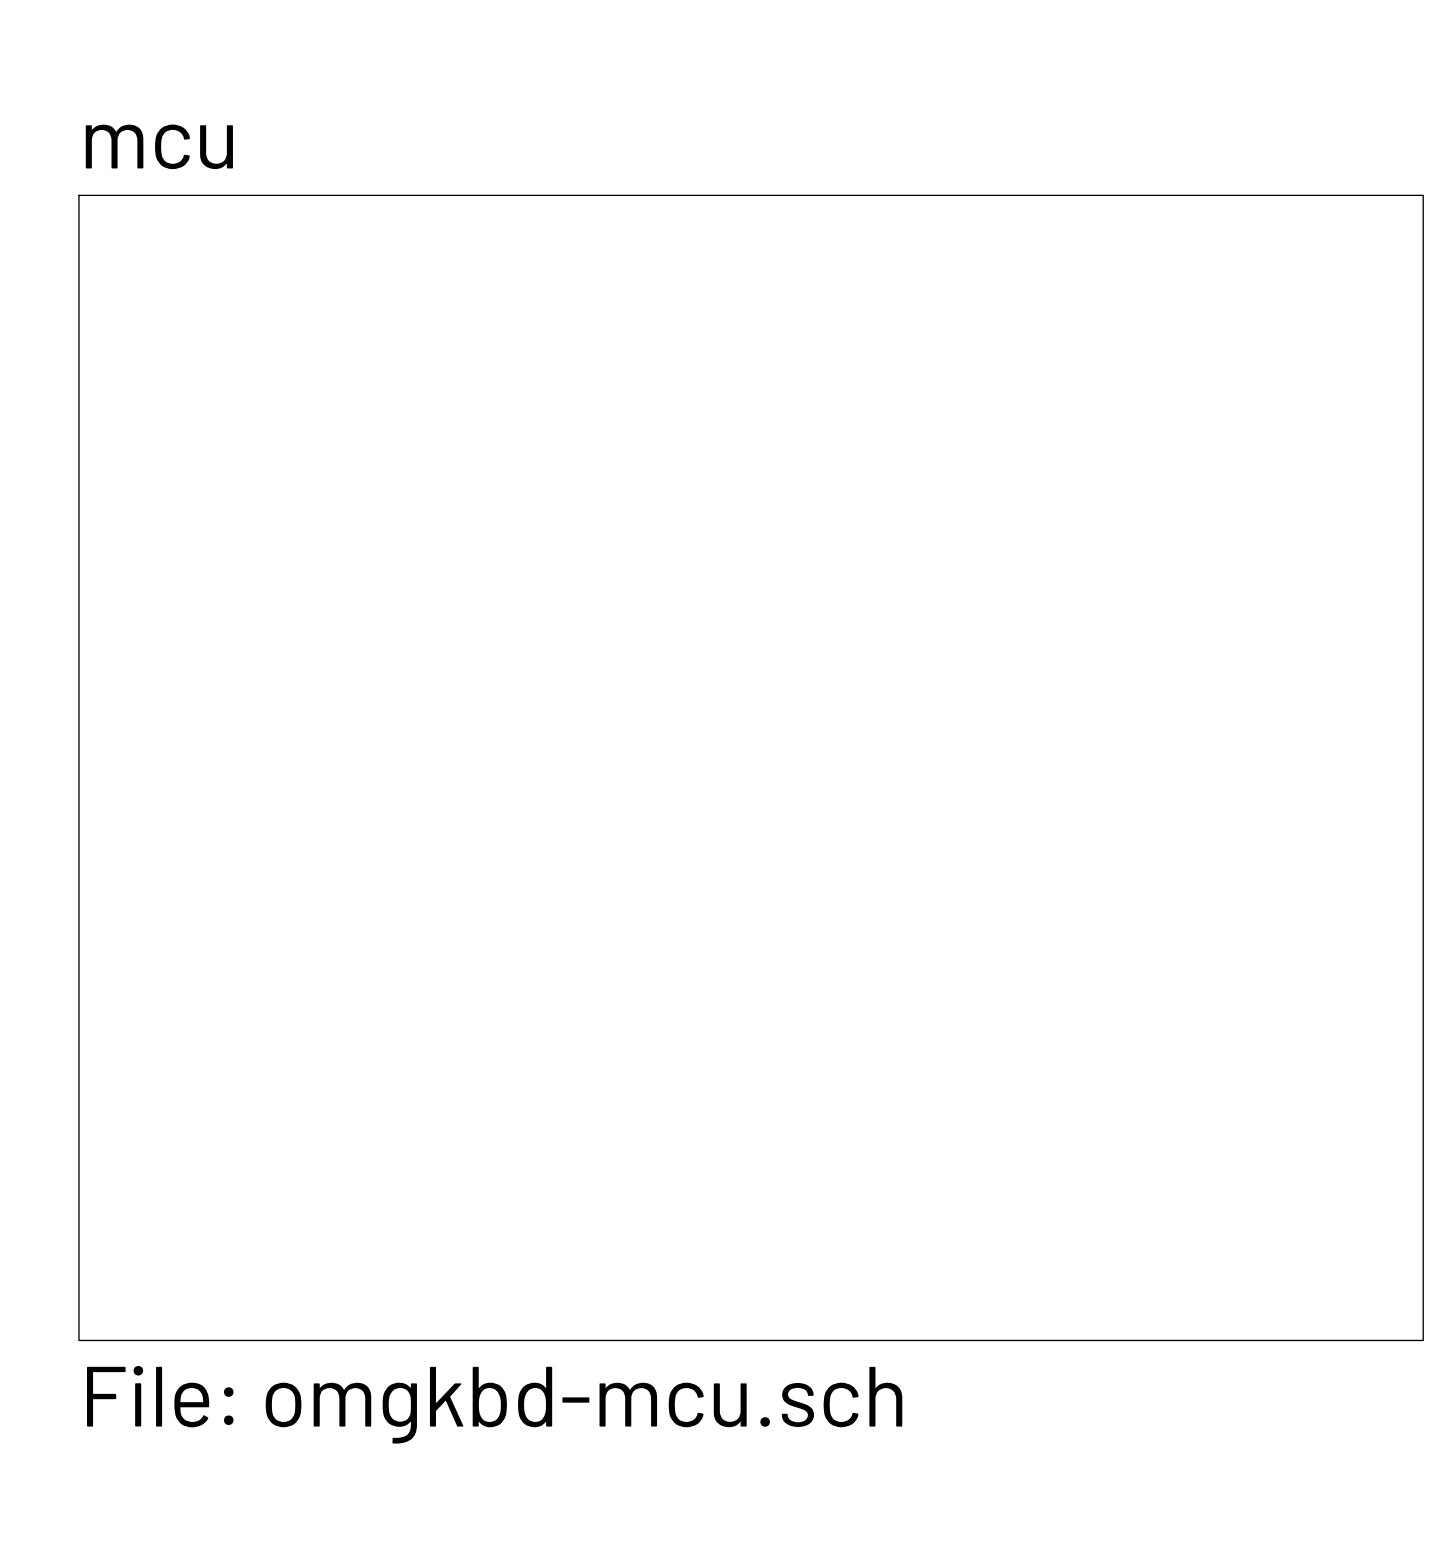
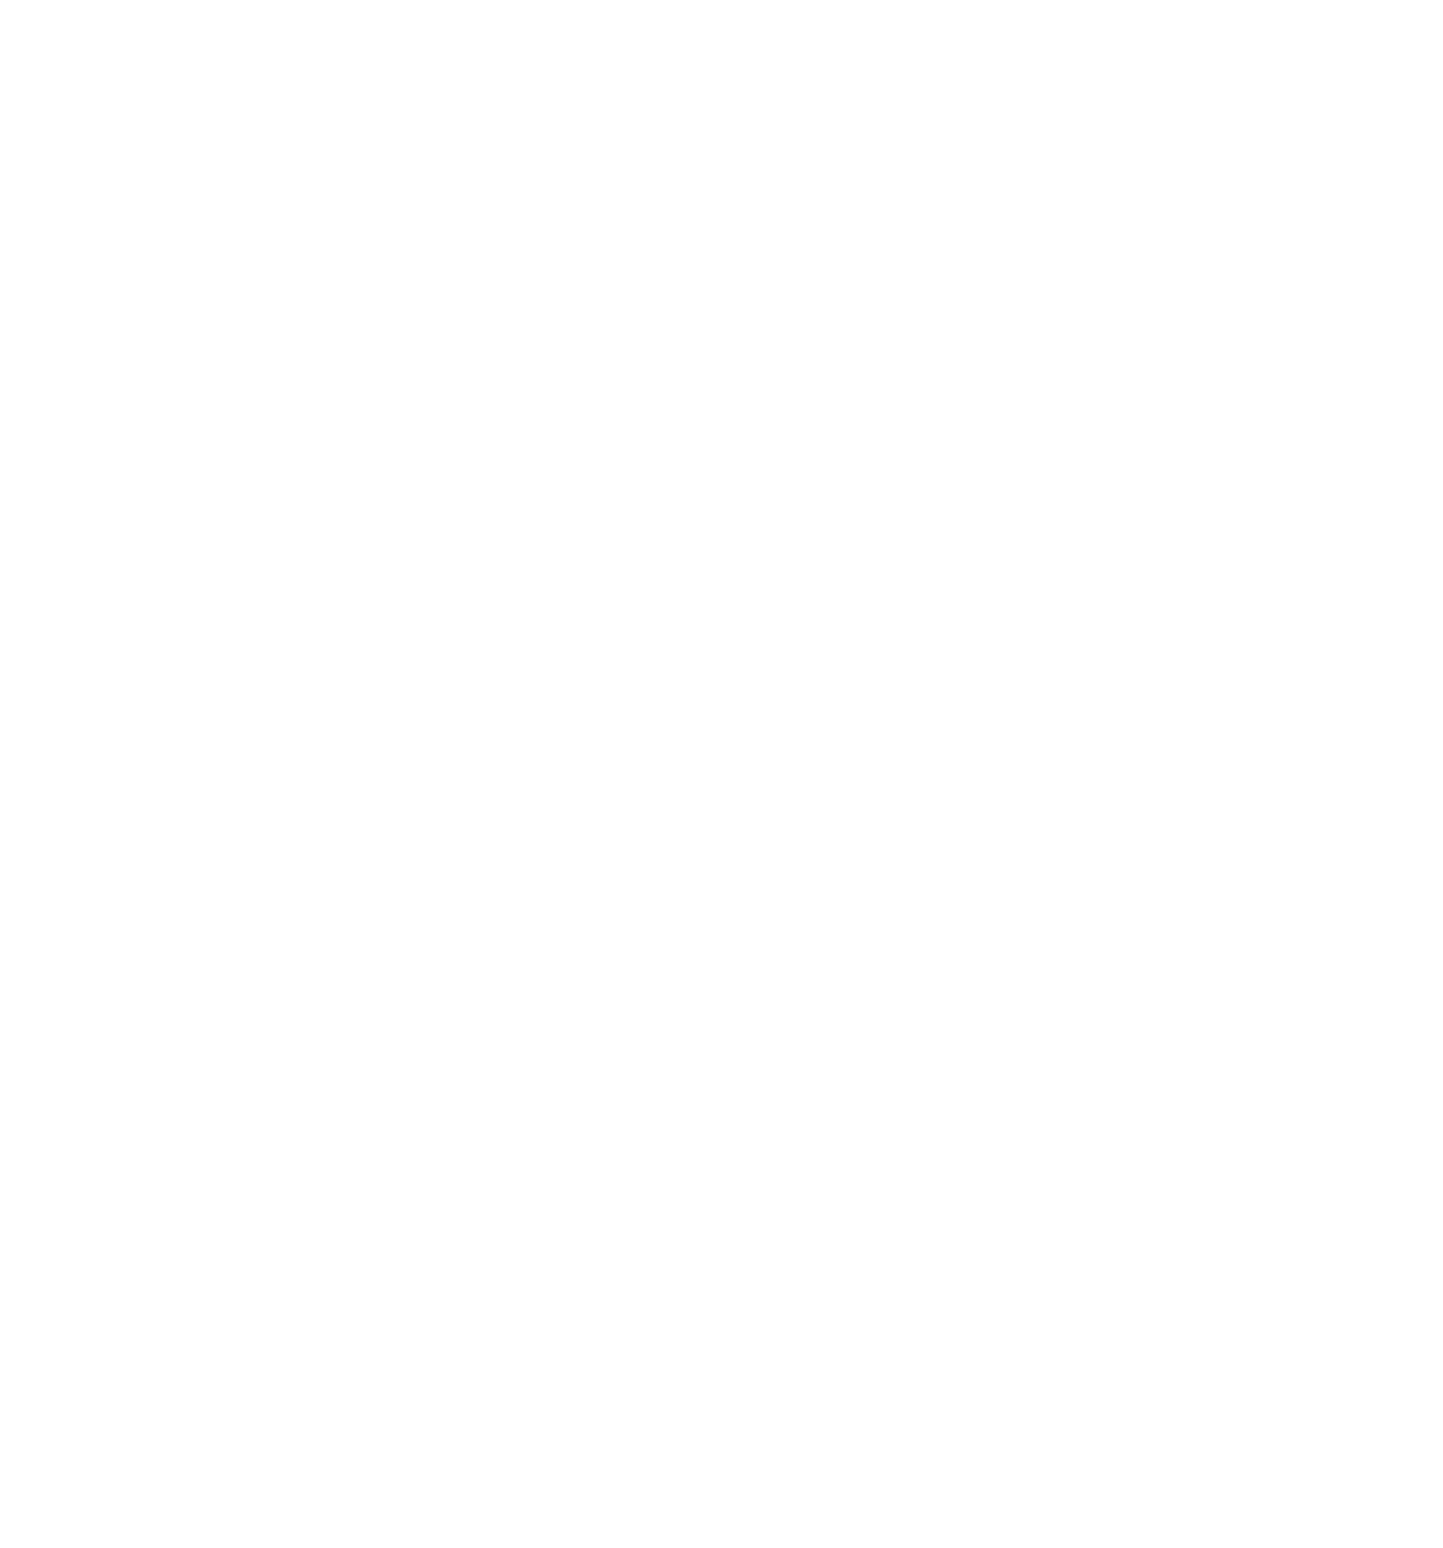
sheet mcu: File: omgkbd-mcu.sch (751, 767) -> none

